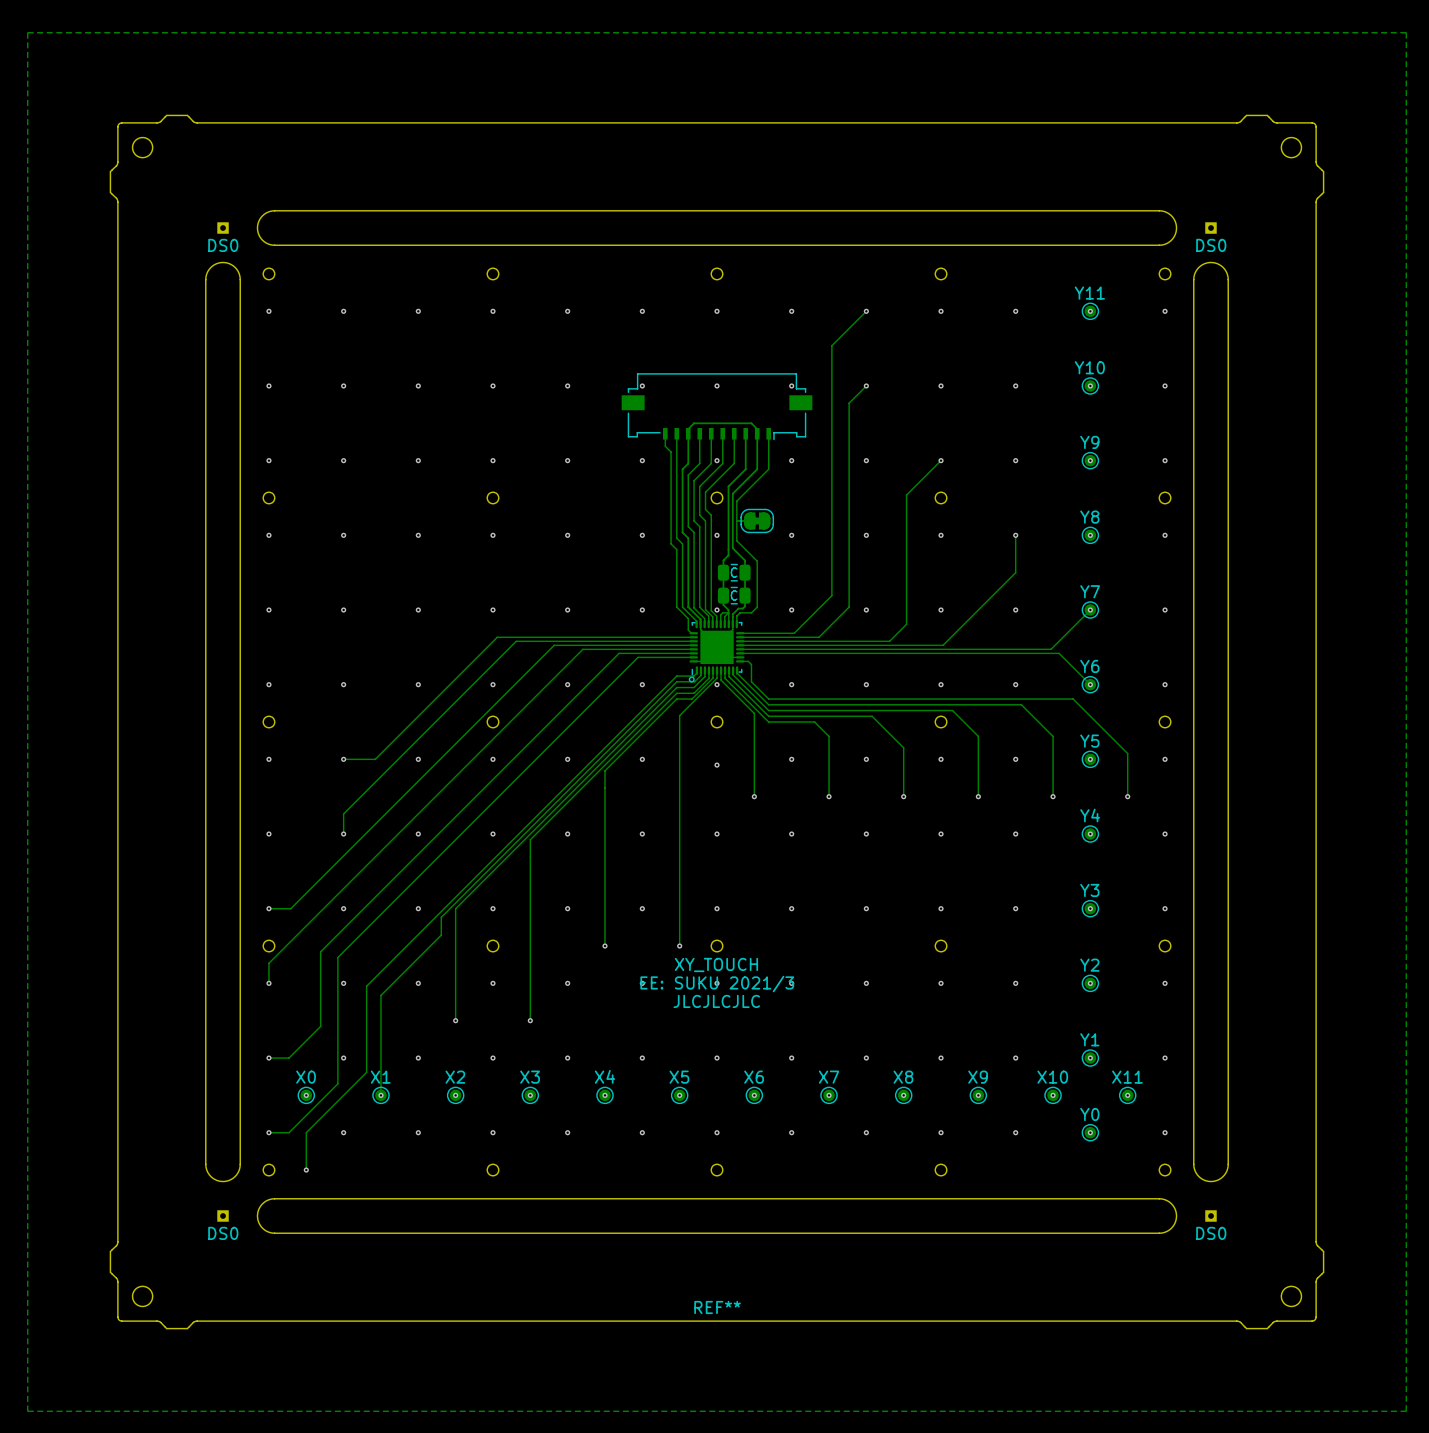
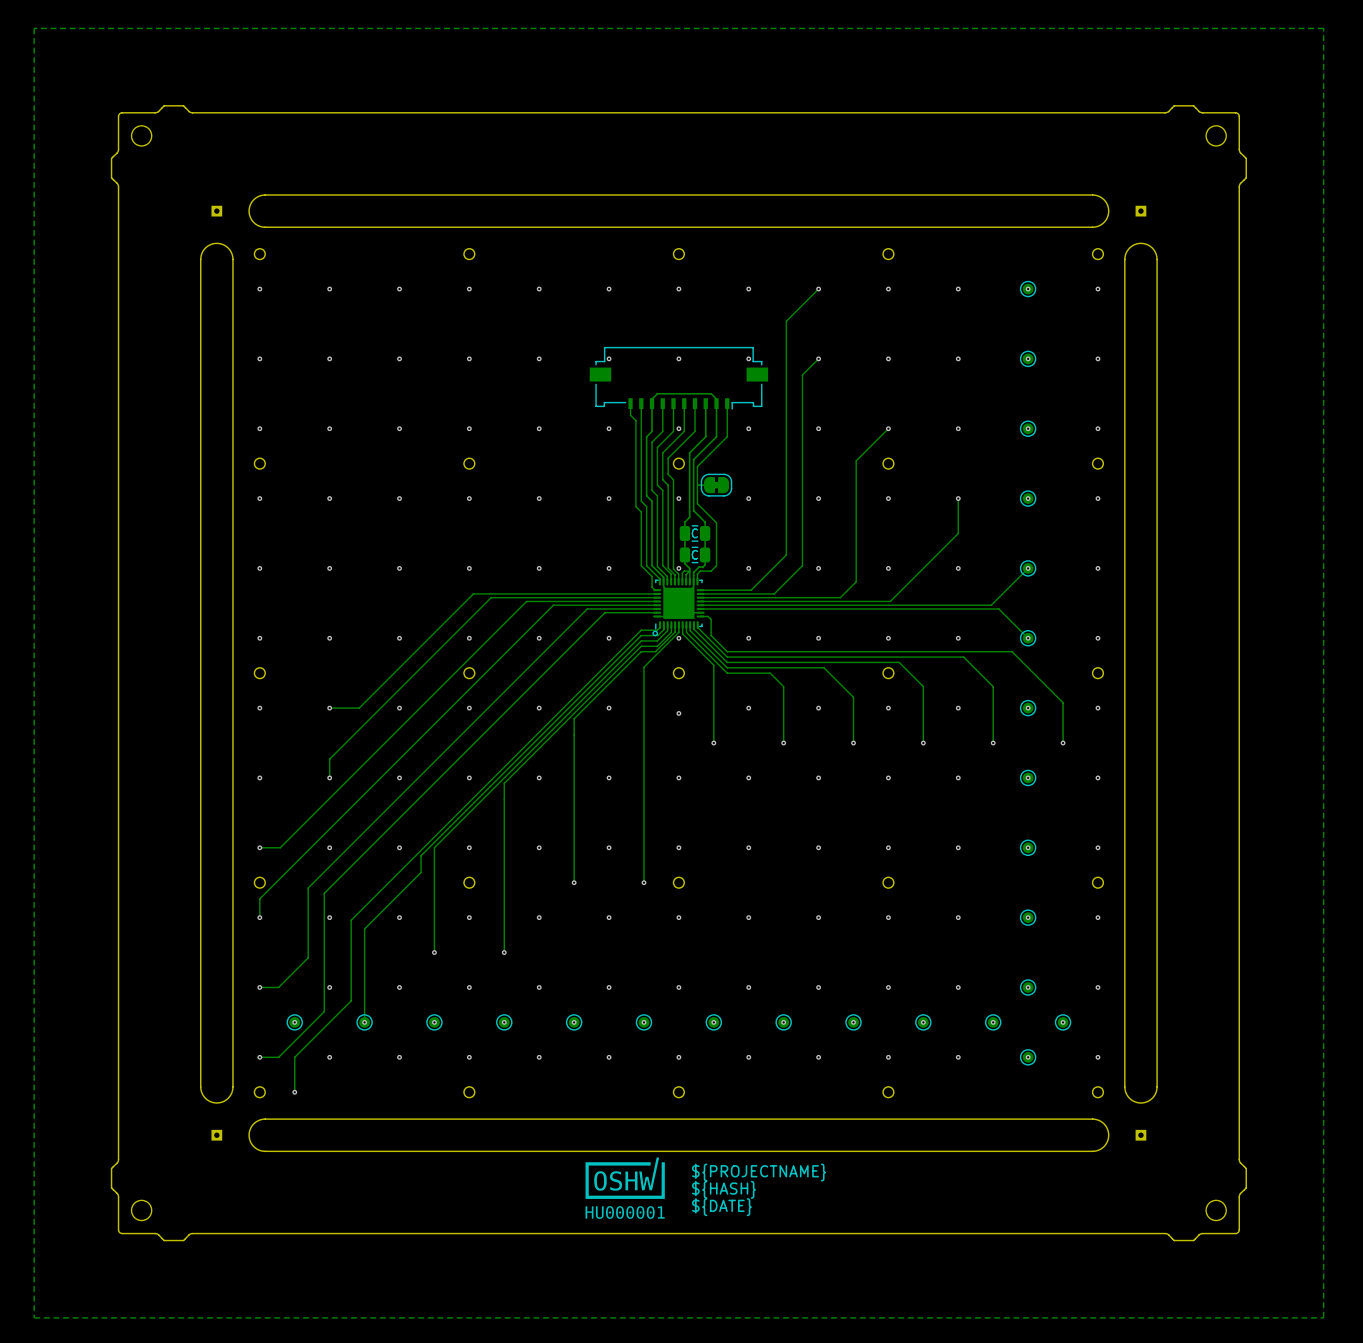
part value: DS0 (223, 245) -> none
part value: DS0 (1211, 245) -> none
part value: Y11 (1089, 293) -> none
part value: Y10 (1089, 367) -> none
part value: Y9 (1089, 442) -> none
part value: Y8 (1089, 517) -> none
part value: Y7 (1090, 591) -> none
part value: Y6 (1089, 666) -> none
REF**: (717, 722) -> none
part: none -> (678, 673)
part value: Y5 (1089, 741) -> none
part value: Y4 (1090, 815) -> none
part value: Y3 (1089, 890) -> none
text: XY_TOUCH (716, 964) -> none
part value: Y2 (1089, 965) -> none
text: EE: SUKU 2021/3 (717, 984) -> none
text: JLCJLCJLC (716, 1001) -> none
part value: Y1 (1089, 1039) -> none
part value: X4 (605, 1076) -> none
part value: X0 (306, 1077) -> none
part value: X1 (380, 1077) -> none
part value: X2 (455, 1077) -> none
part value: X3 (530, 1077) -> none
part value: X5 (679, 1077) -> none
part value: X6 (754, 1077) -> none
part value: X7 (829, 1077) -> none
part value: X8 (903, 1077) -> none
part value: X9 (978, 1077) -> none
part value: X10 (1052, 1077) -> none
part value: X11 (1127, 1077) -> none
part value: Y0 (1089, 1114) -> none
part value: DS0 (223, 1233) -> none
part value: DS0 (1211, 1233) -> none
drawing: none -> [585, 1157, 665, 1219]
text: none -> ${PROJECTNAME} (759, 1172)
text: none -> ${HASH} (723, 1189)
text: none -> ${DATE} (721, 1207)

